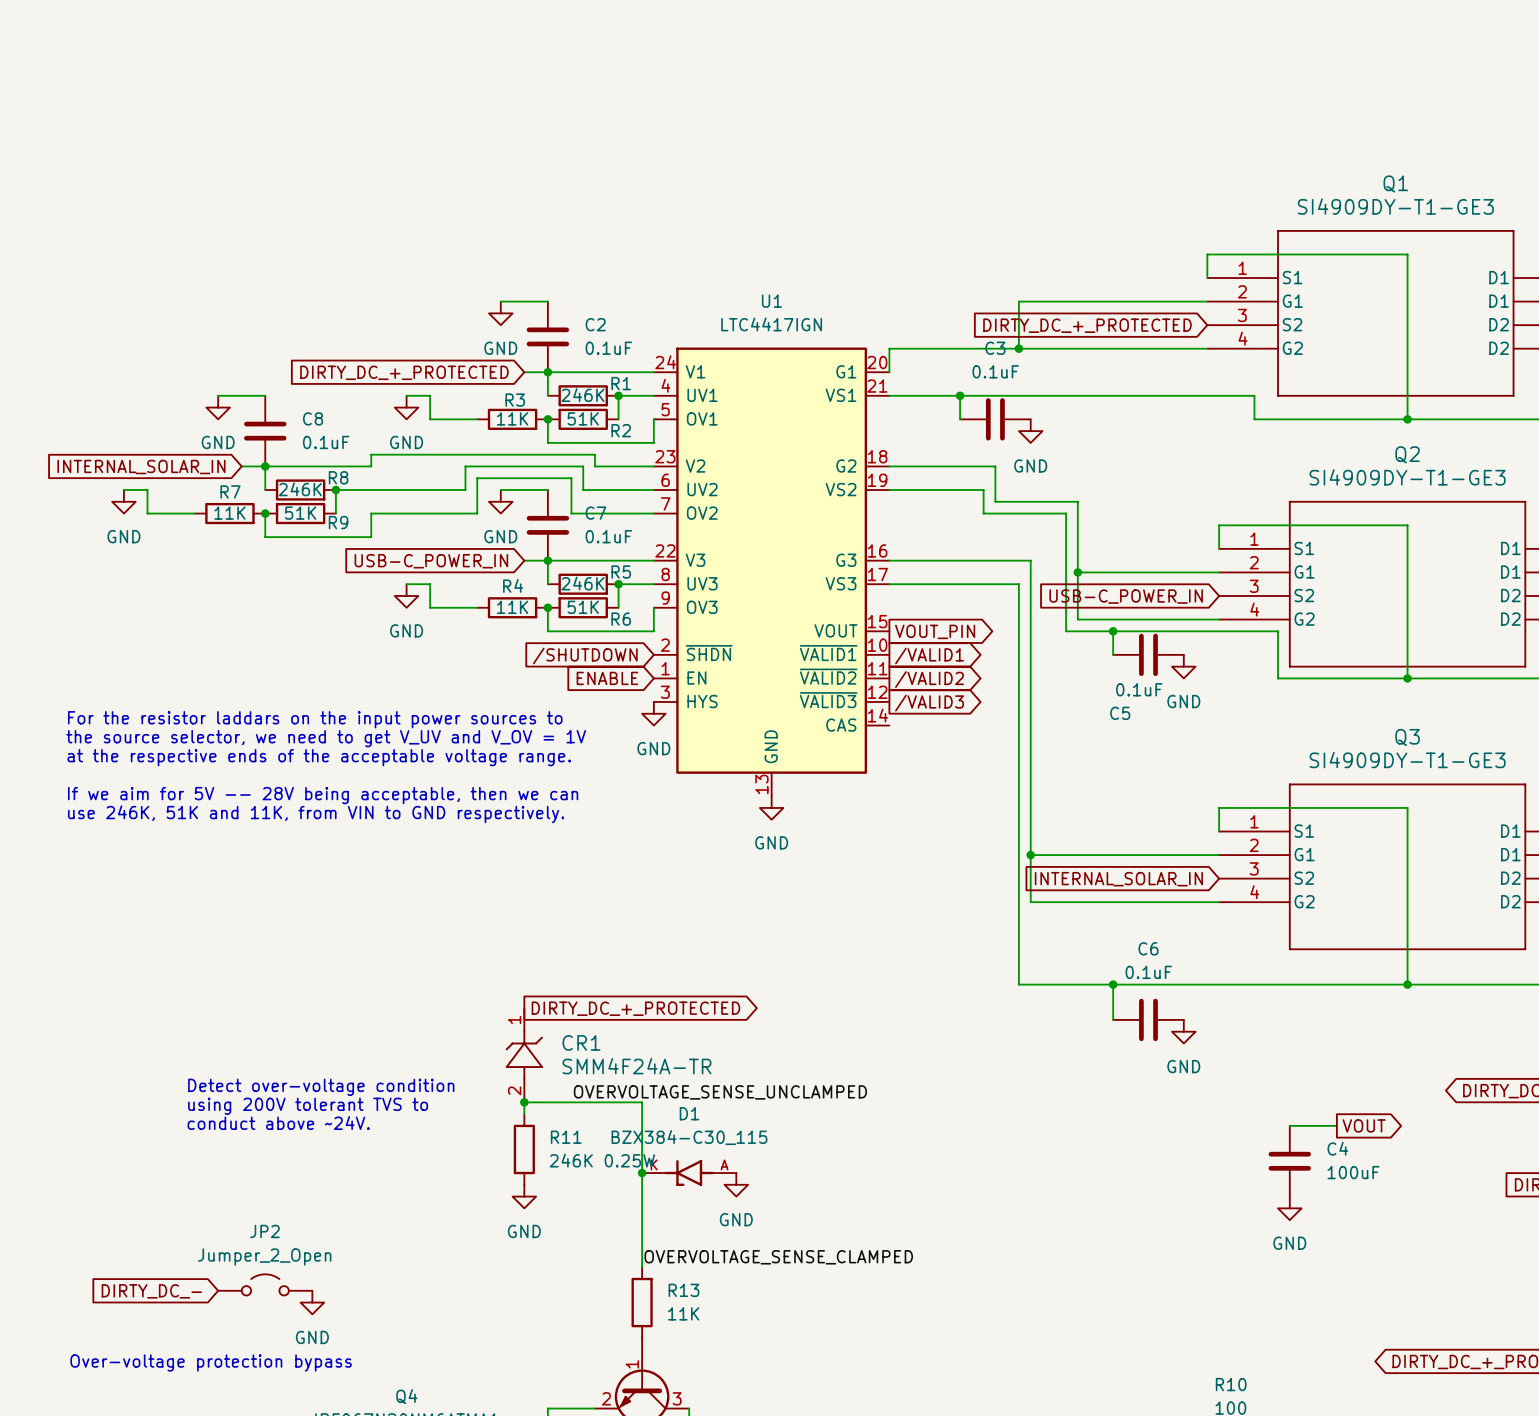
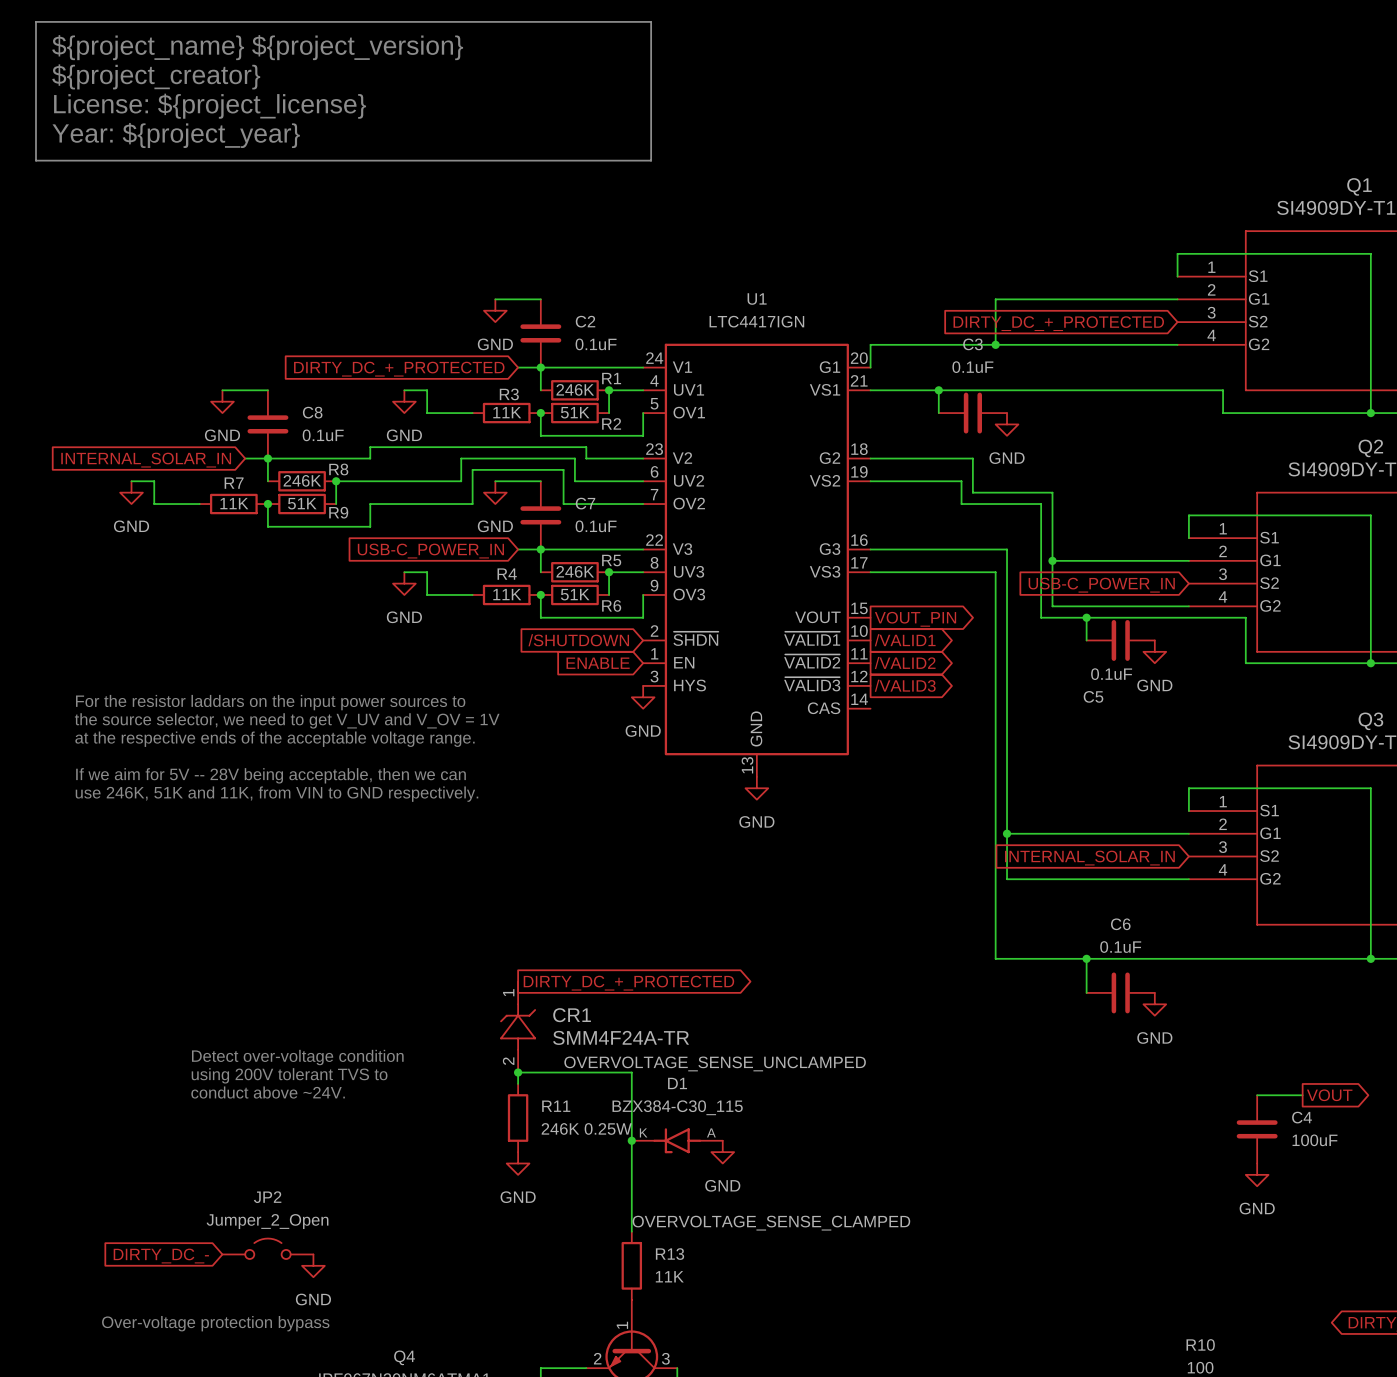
line: none -> (35, 21) (651, 21) (651, 160) (35, 160) (35, 21)
text: none -> ${project_name} ${project_version} (257, 47)
text: none -> ${project_creator} (156, 76)
text: none -> License: ${project_license} (210, 106)
text: none -> Year: ${project_year} (176, 135)

